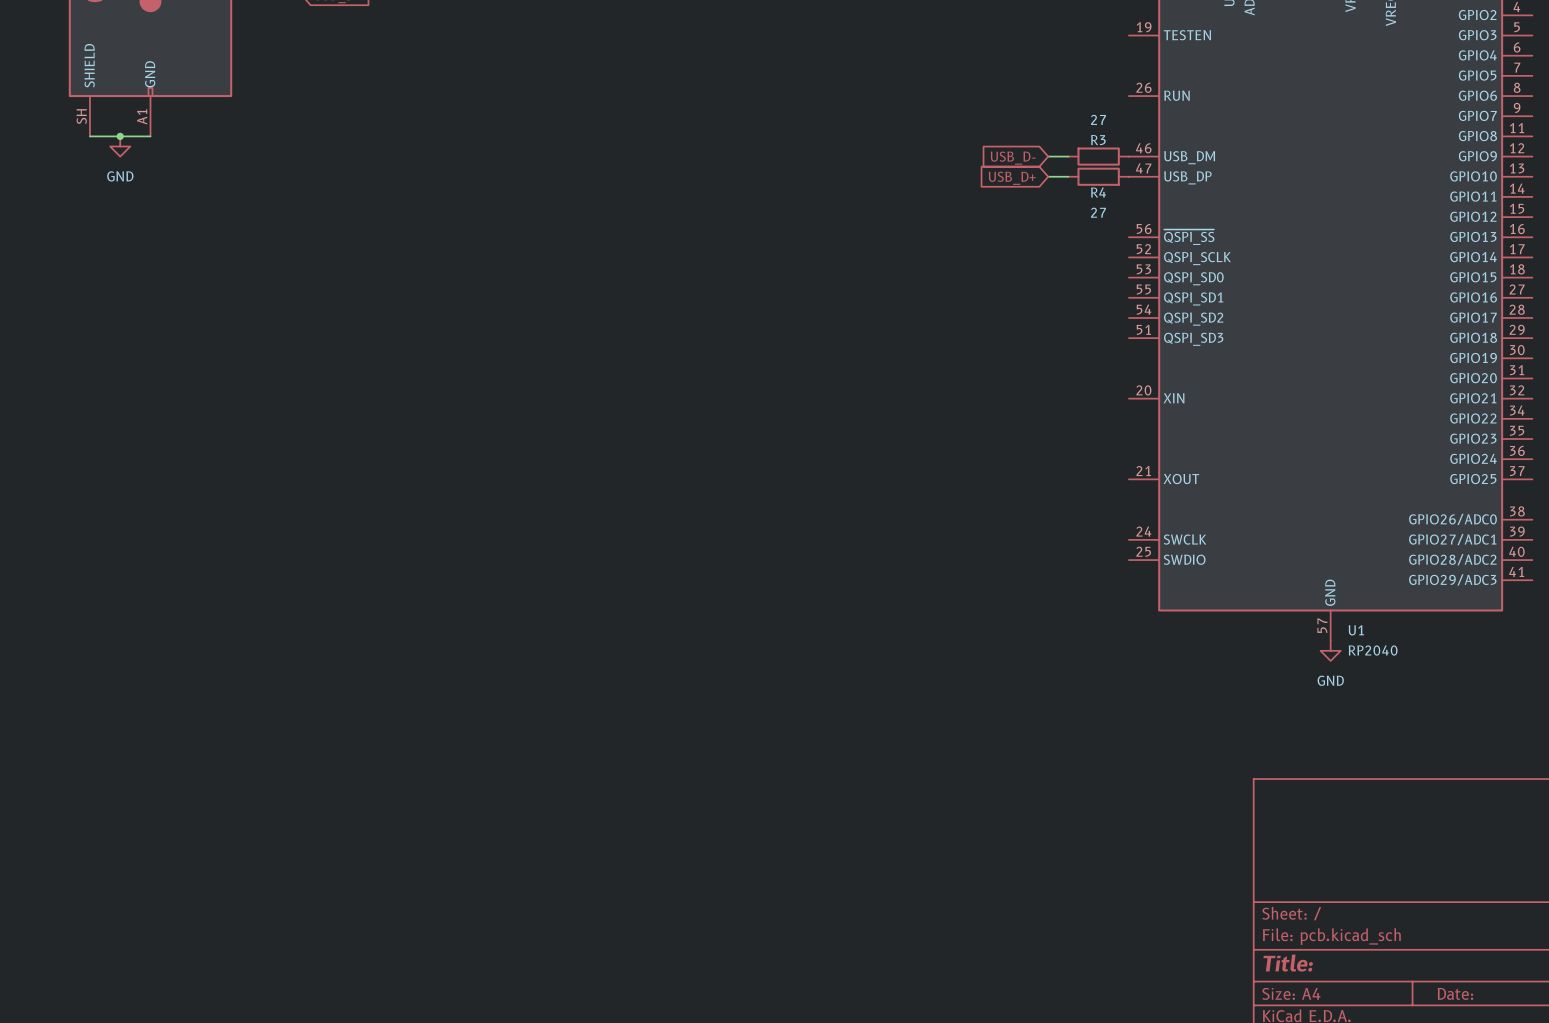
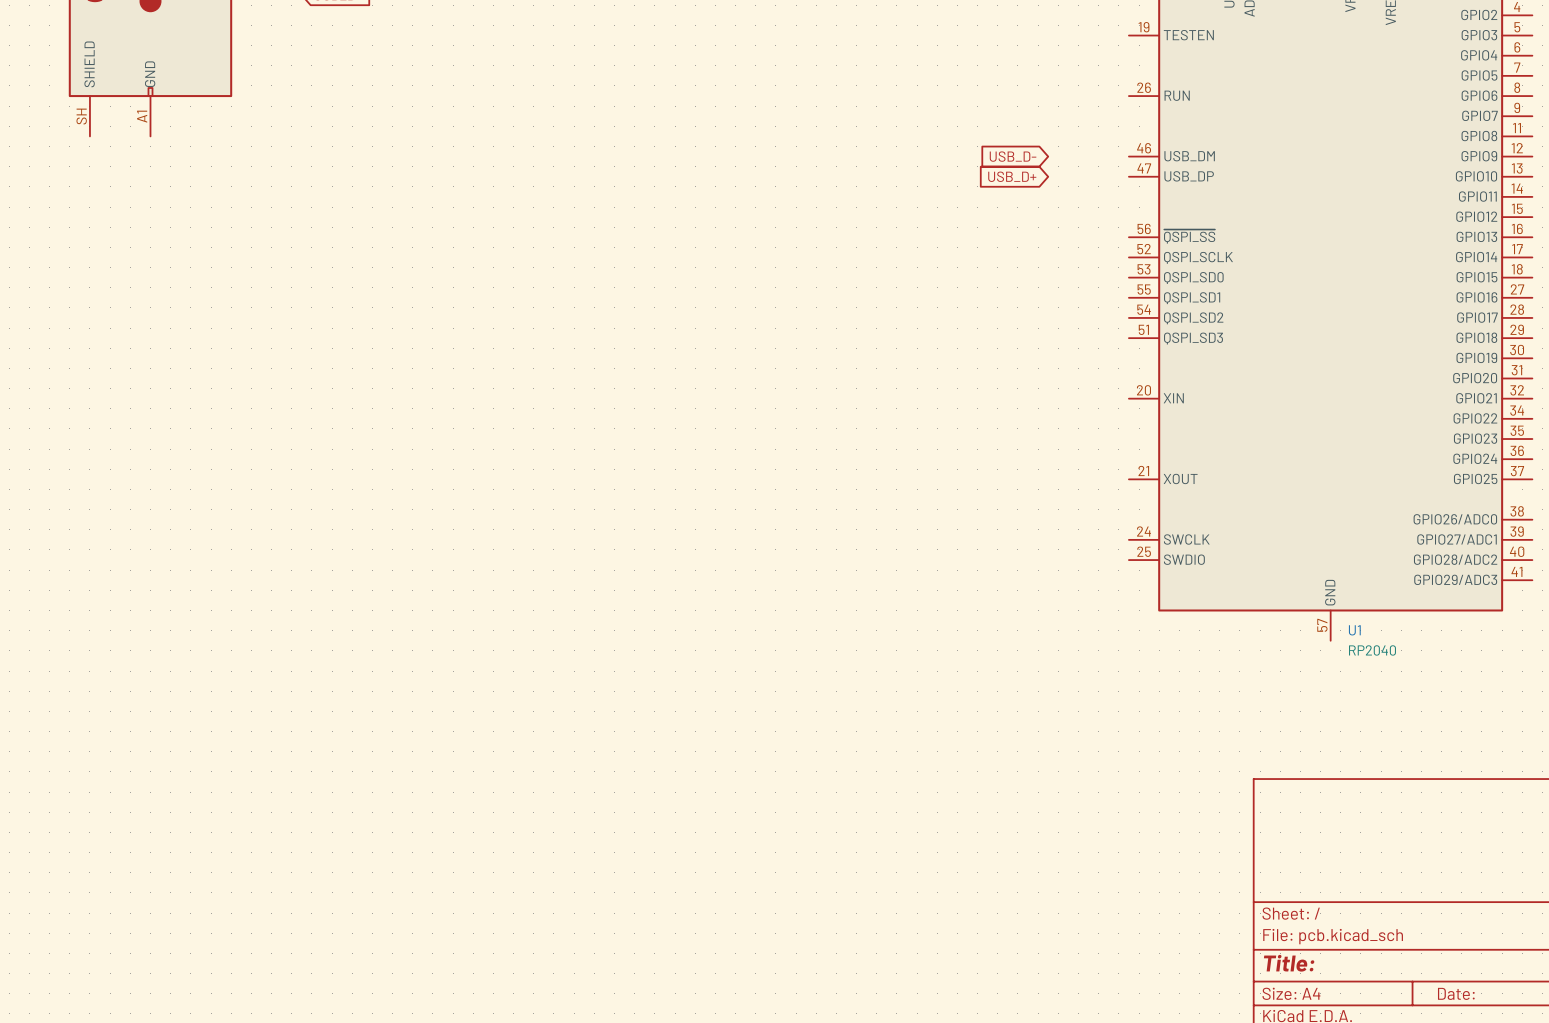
wire: (89, 136) (150, 136) -> none
junction: (120, 136) -> none
power symbol: GND (120, 146) -> none
wire: (1048, 156) (1068, 156) -> none
R3: 27 (1098, 156) -> none
wire: (1048, 176) (1068, 176) -> none
R4: 27 (1098, 176) -> none
power symbol: GND (1330, 650) -> none

